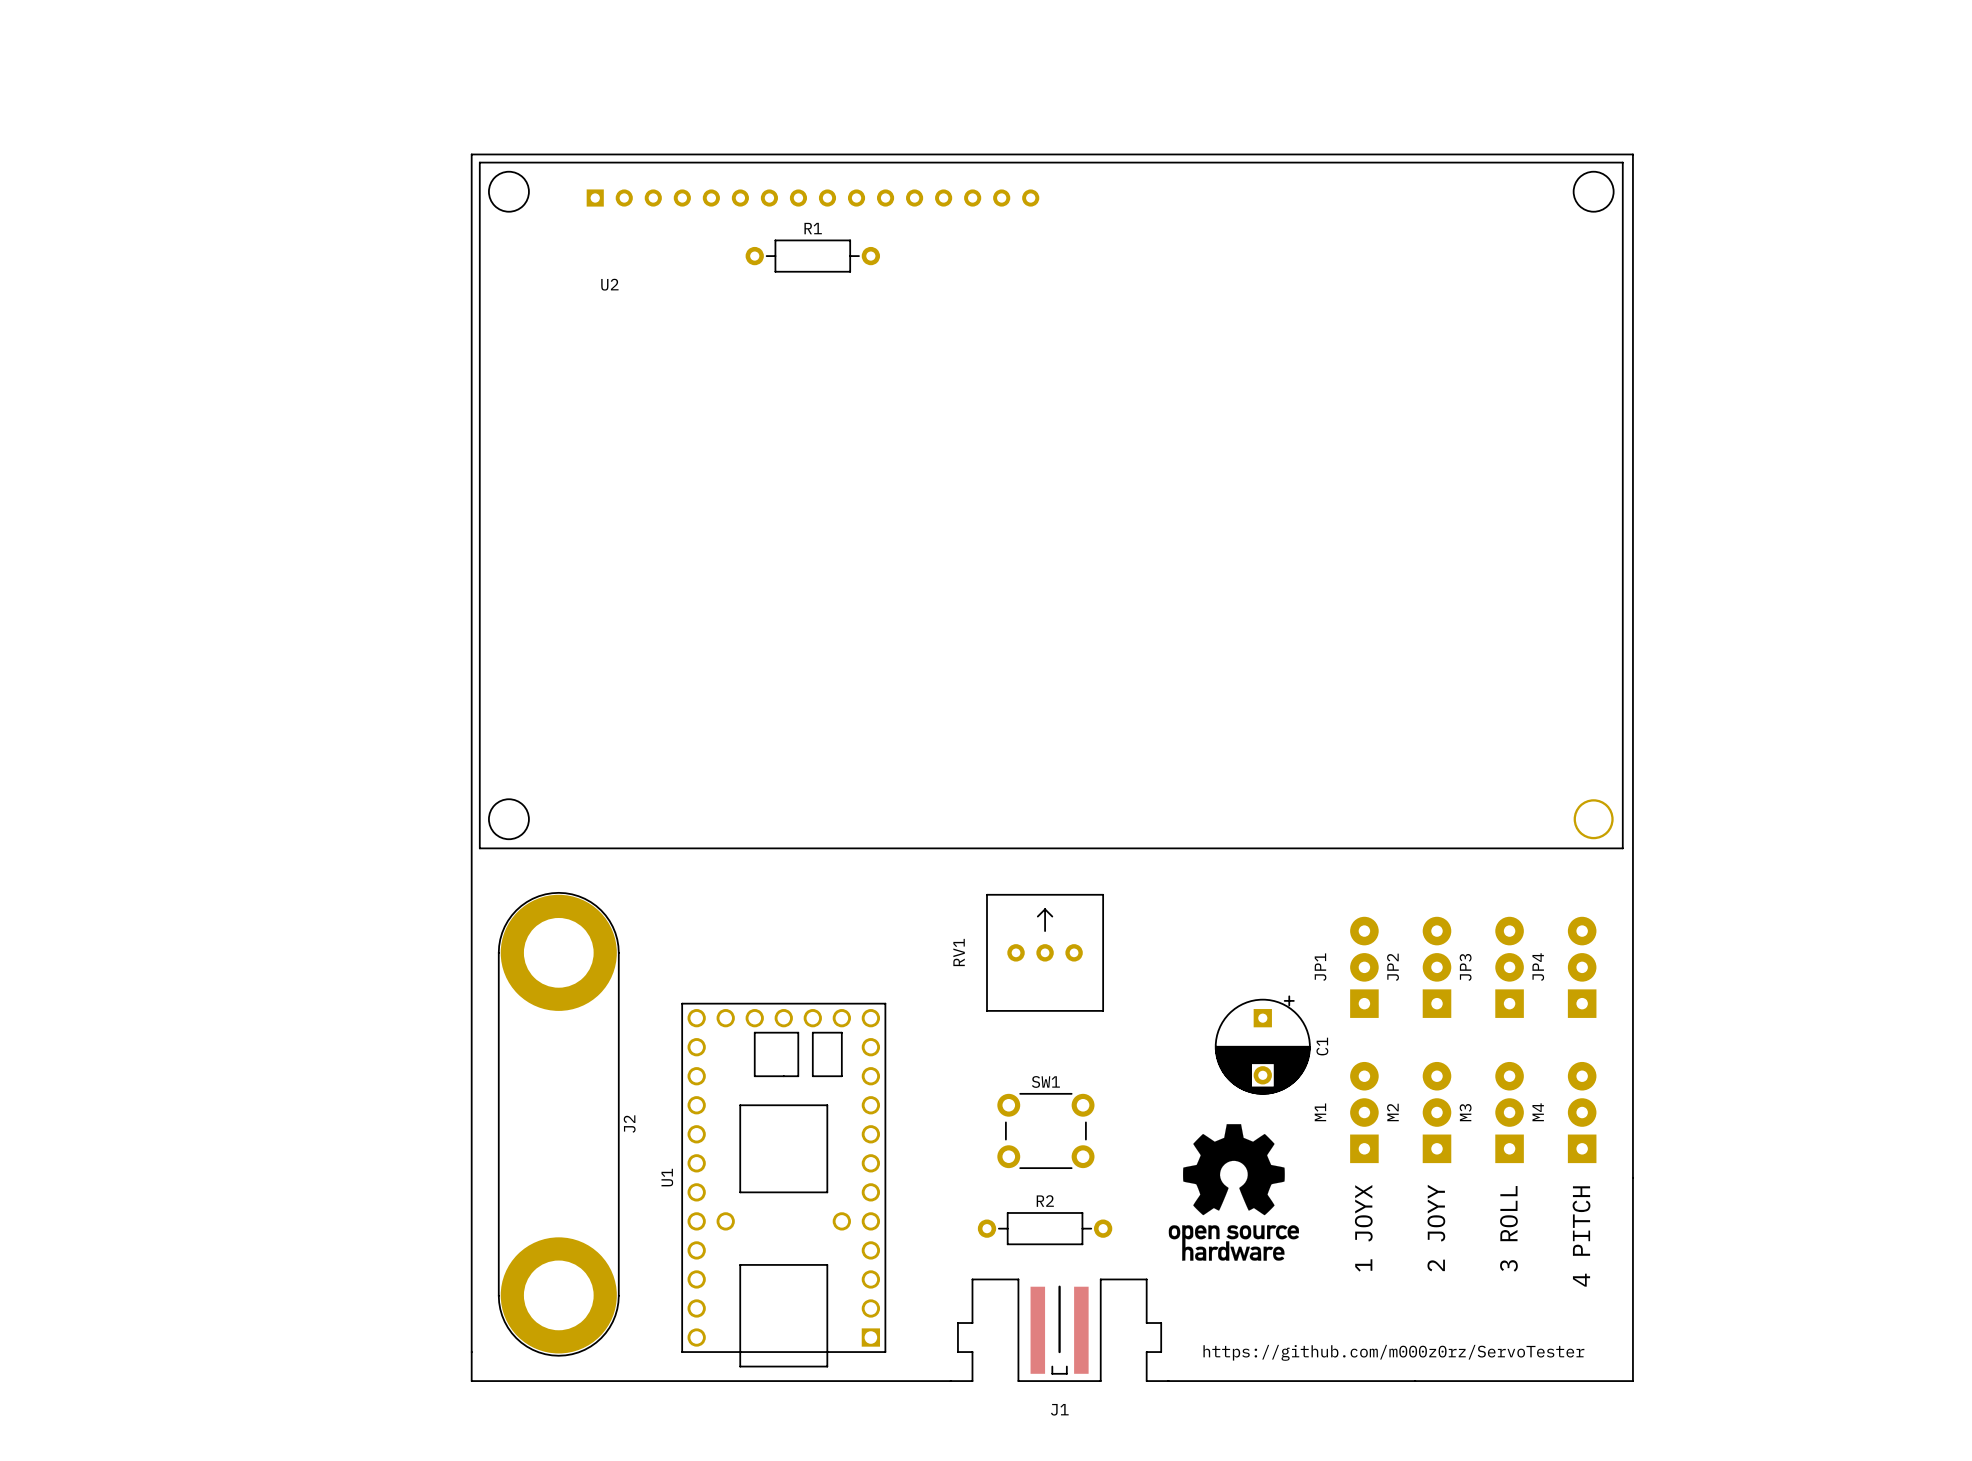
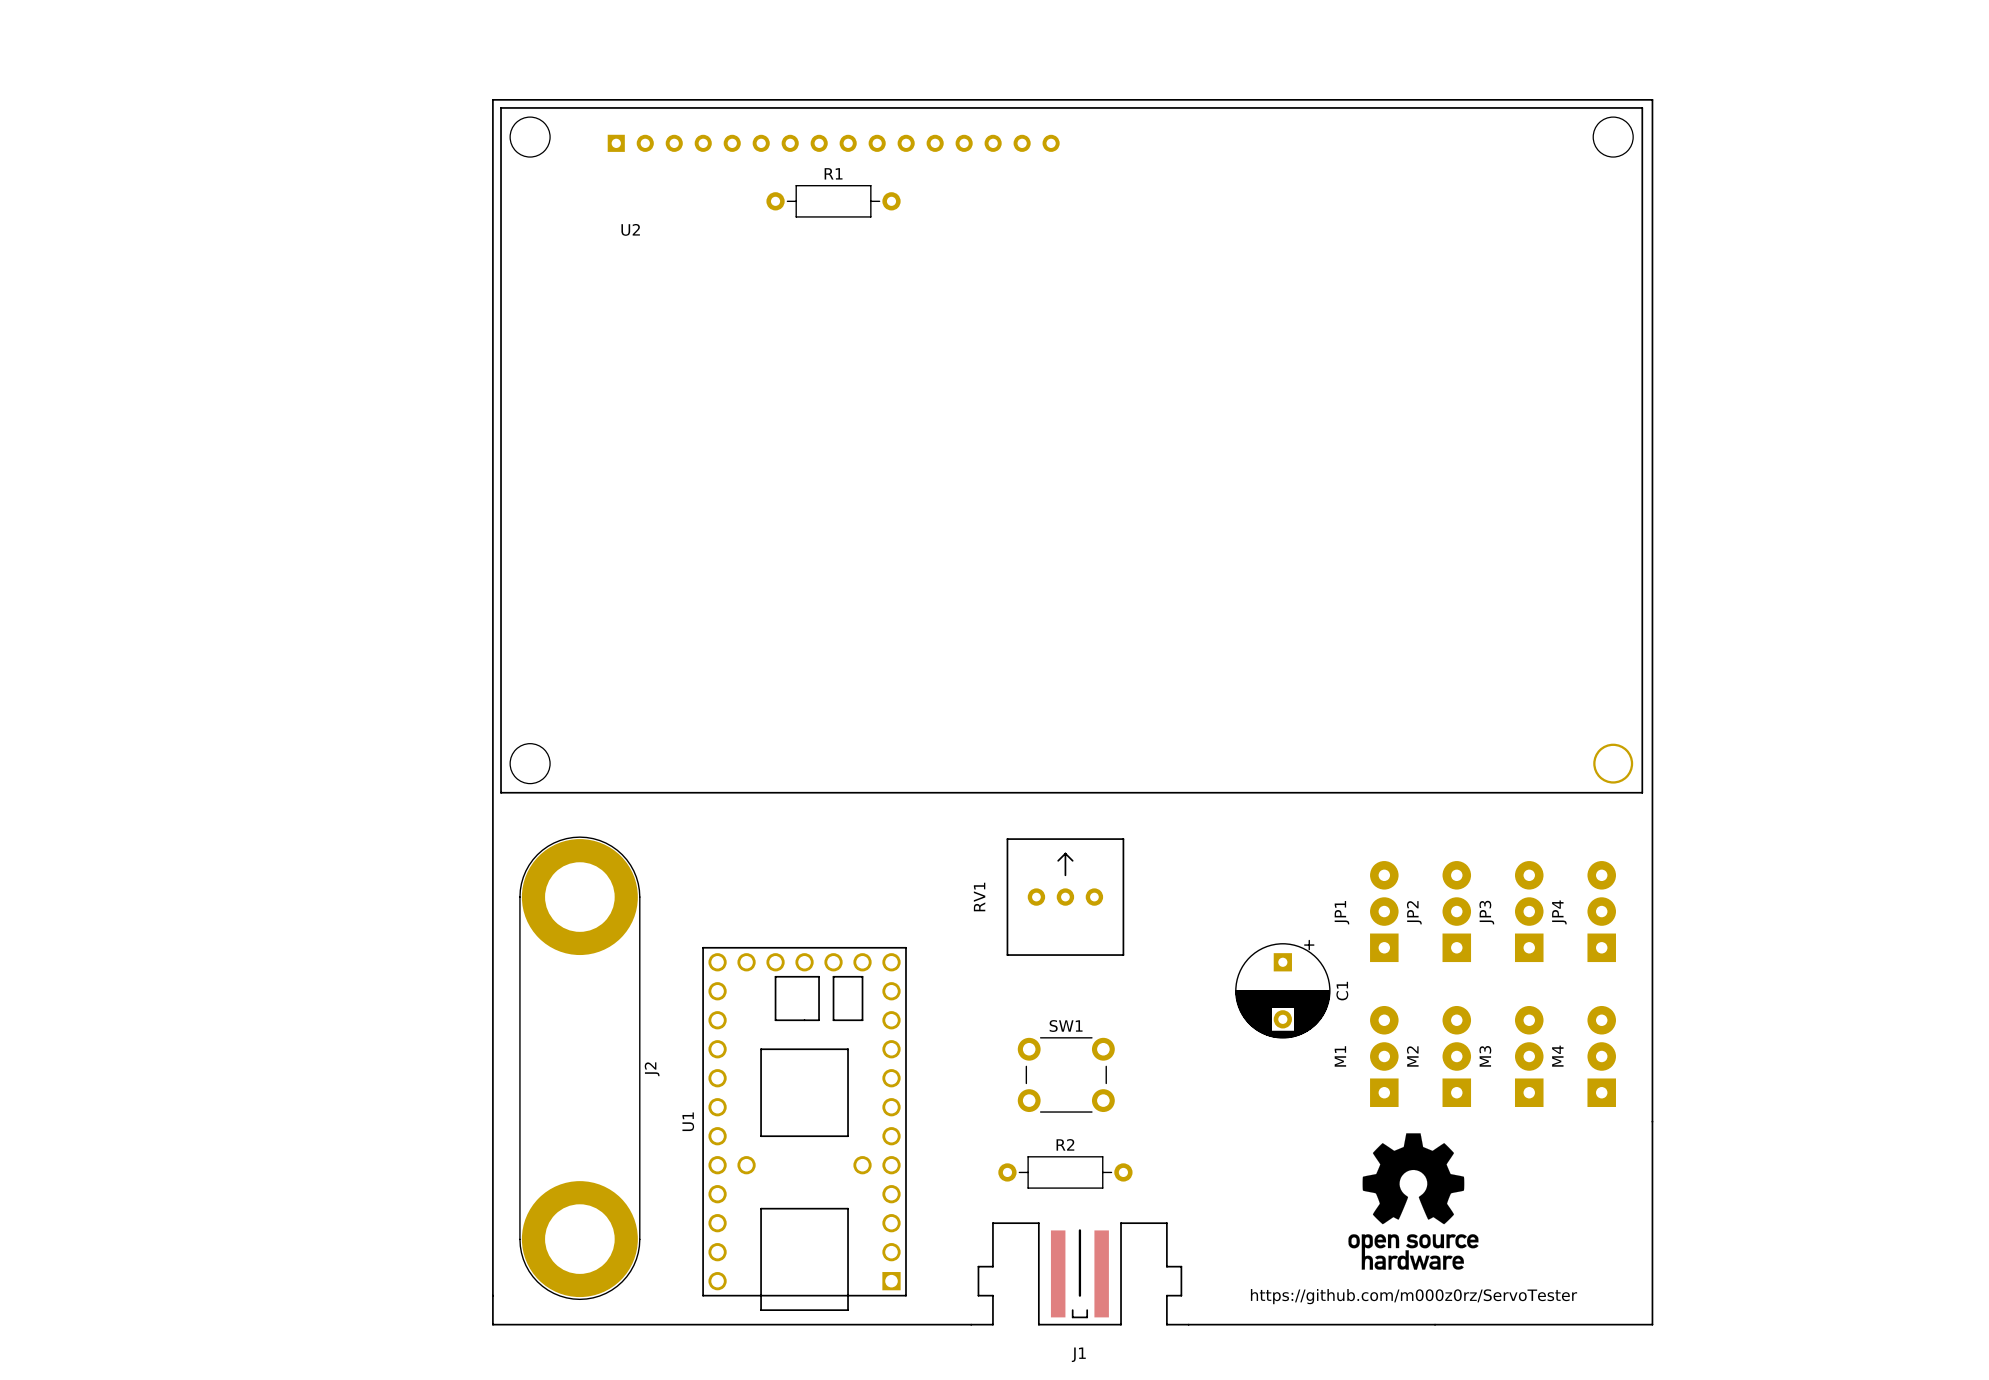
drawing position: (1233, 1192) -> (1413, 1201)
text: 1 JOYX (1363, 1228) -> none
text: 2 JOYY (1436, 1228) -> none
text: 3 ROLL (1508, 1228) -> none
text: 4 PITCH (1581, 1236) -> none

